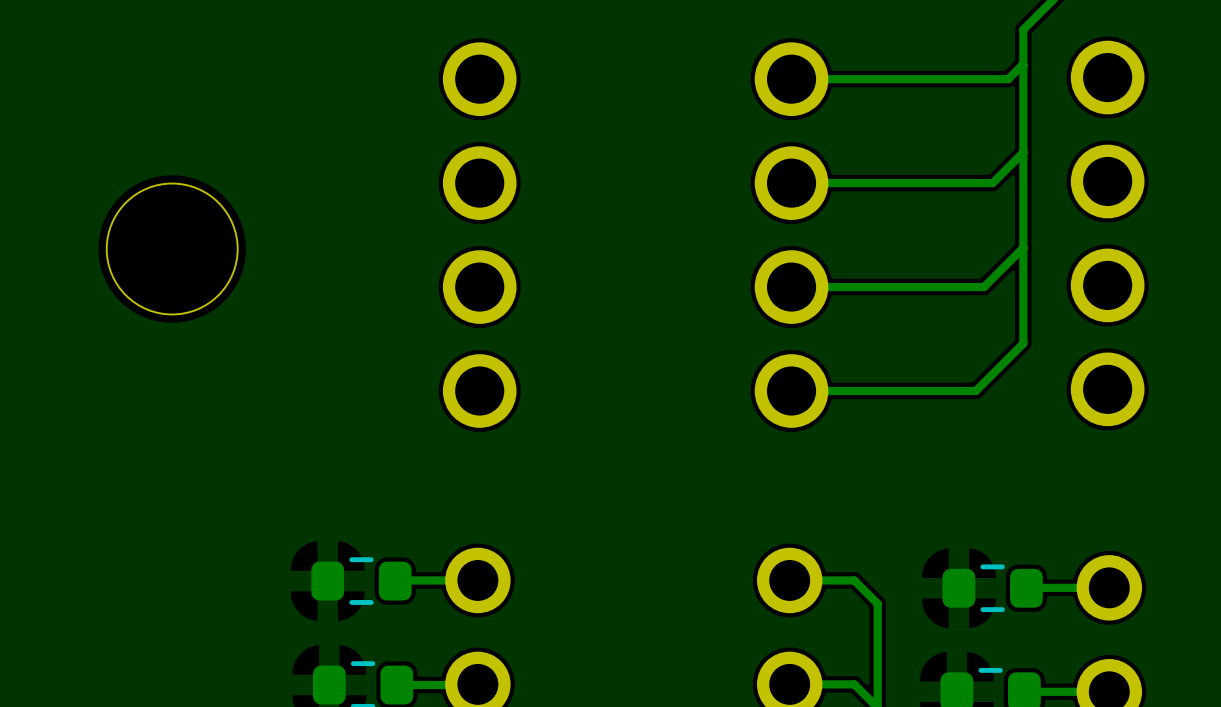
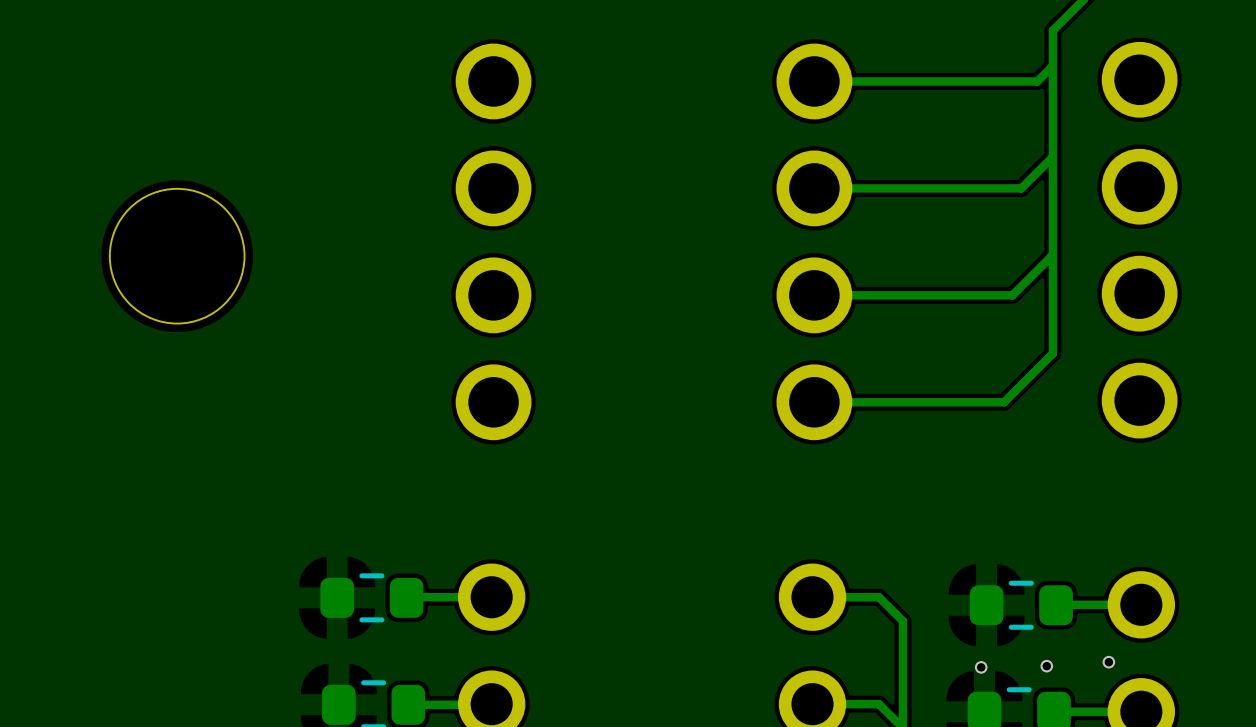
via: none -> (1108, 662)
via: none -> (1046, 666)
via: none -> (981, 667)

